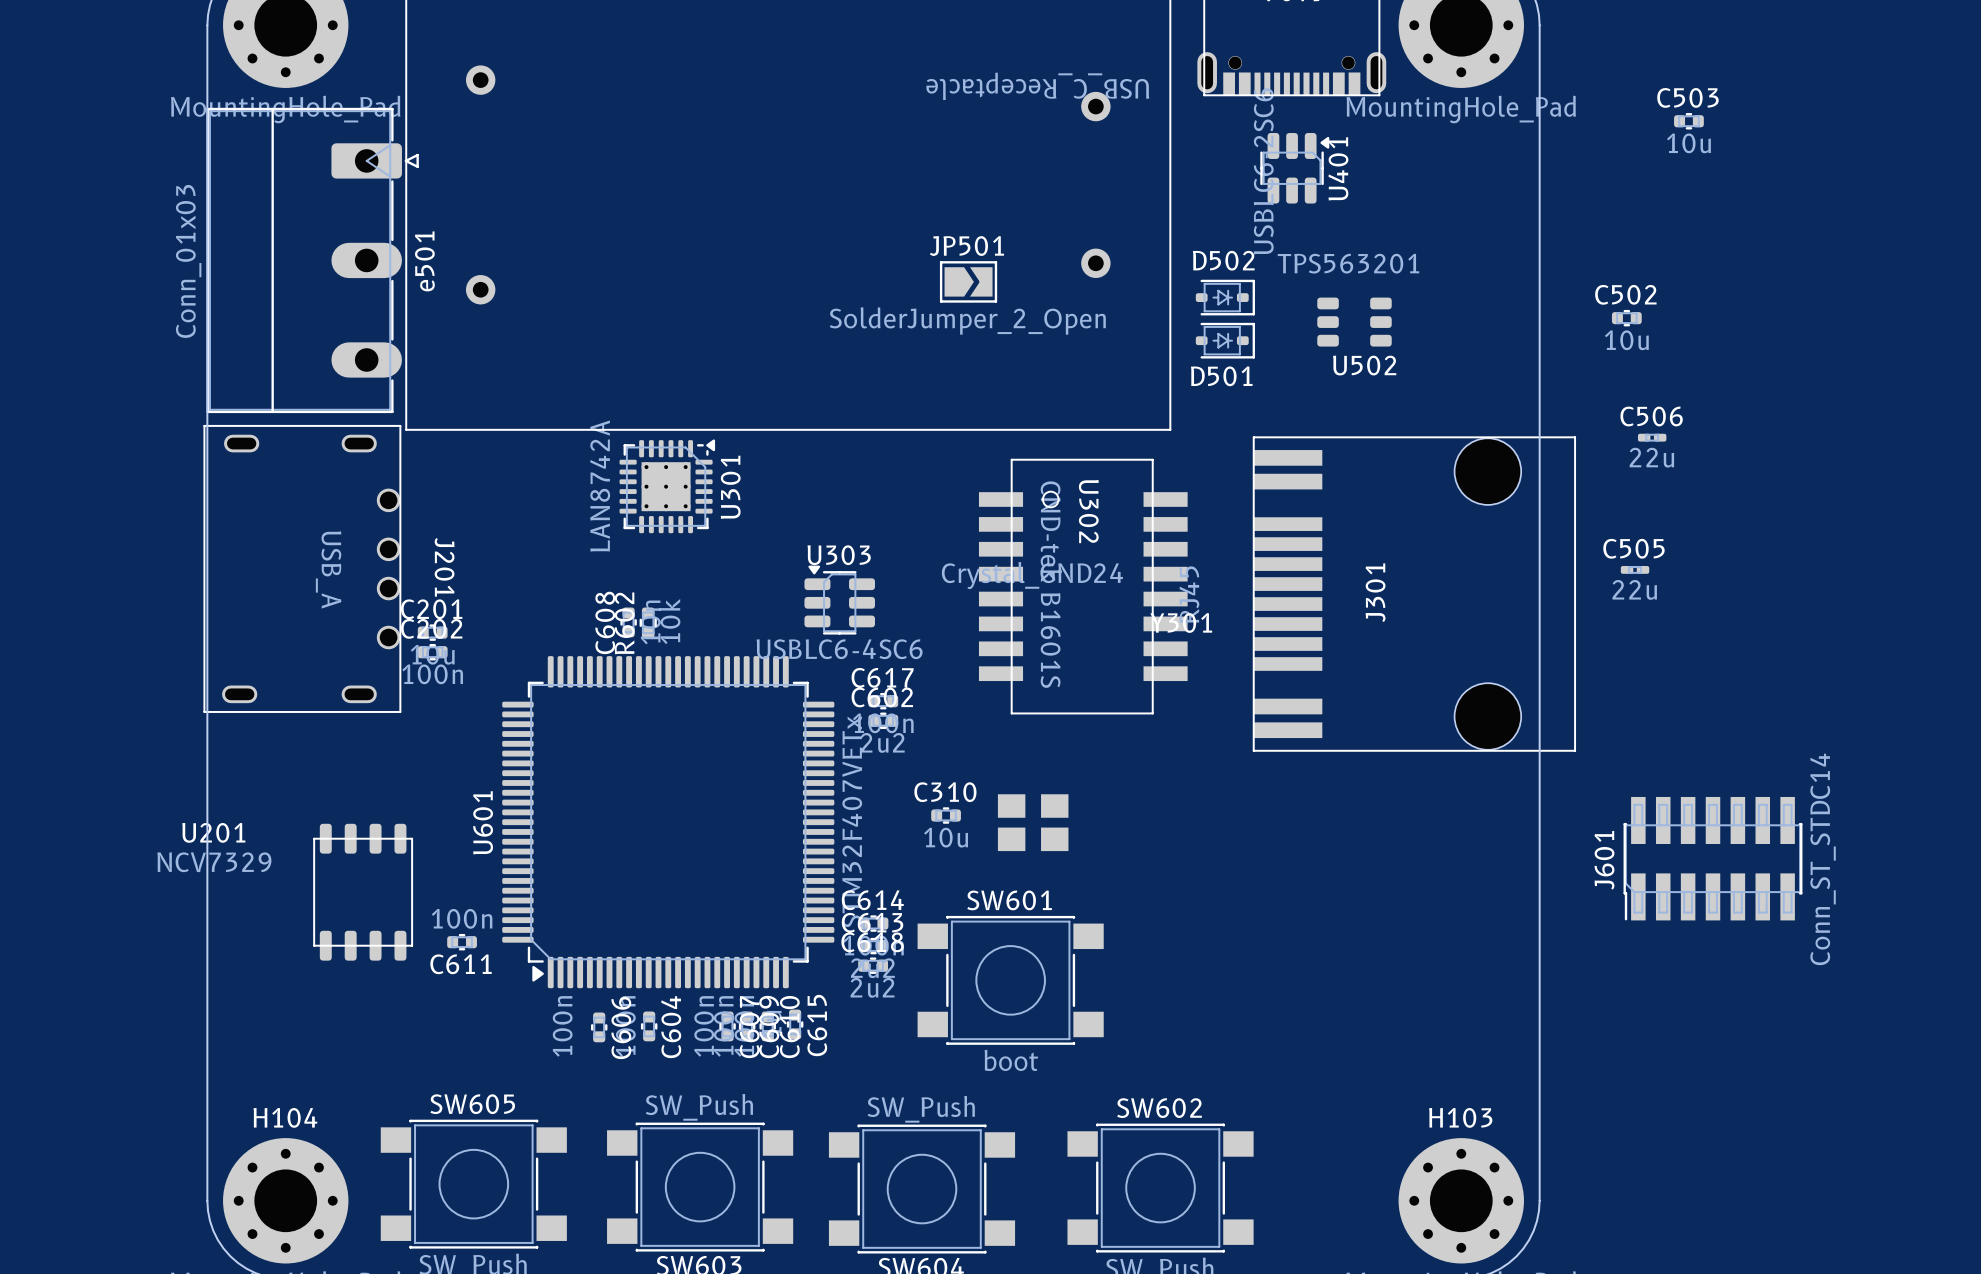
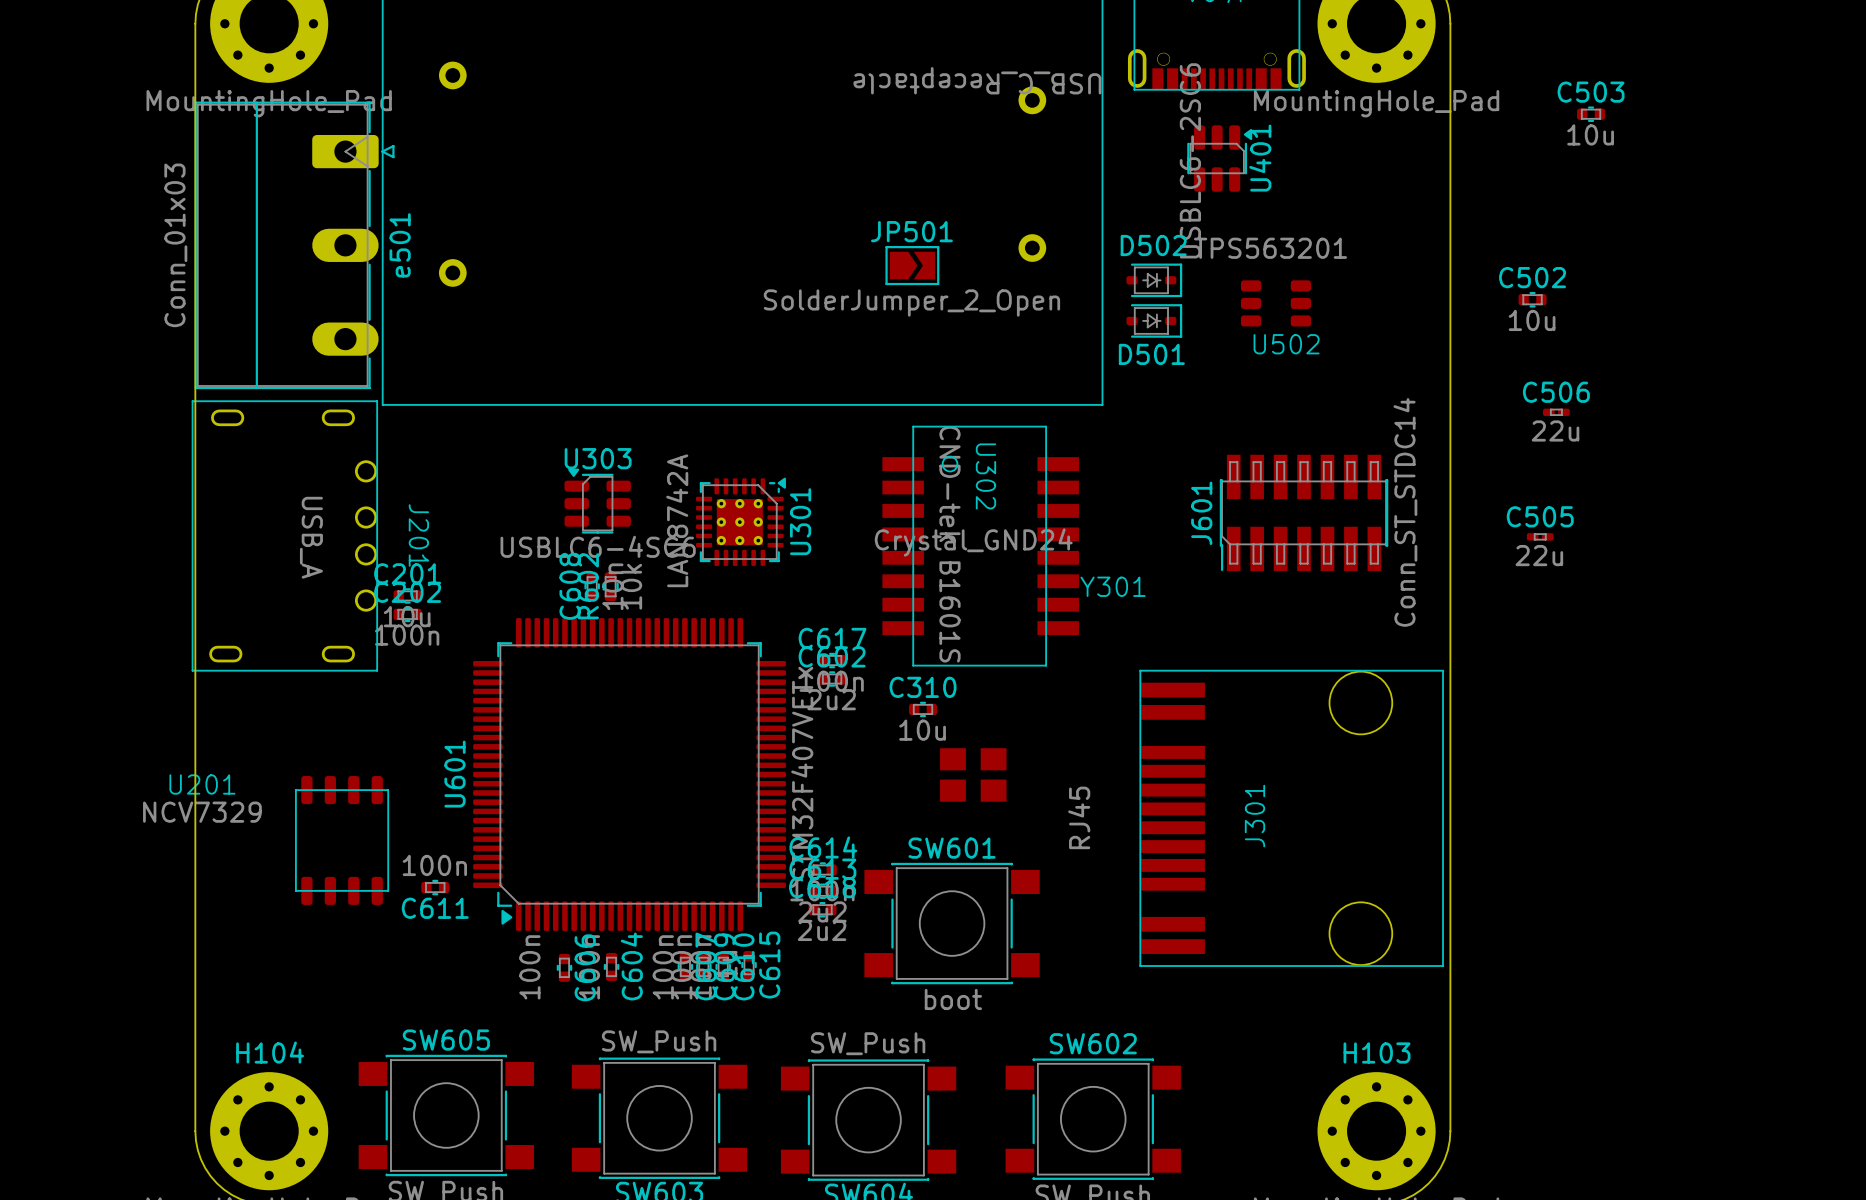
U301 position: (667, 486) -> (740, 521)
U302 position: (1083, 586) -> (980, 546)
J301 position: (1414, 594) -> (1291, 818)
U303 position: (839, 600) -> (597, 501)
C310 position: (946, 815) -> (922, 709)
J601 position: (1712, 858) -> (1304, 512)

